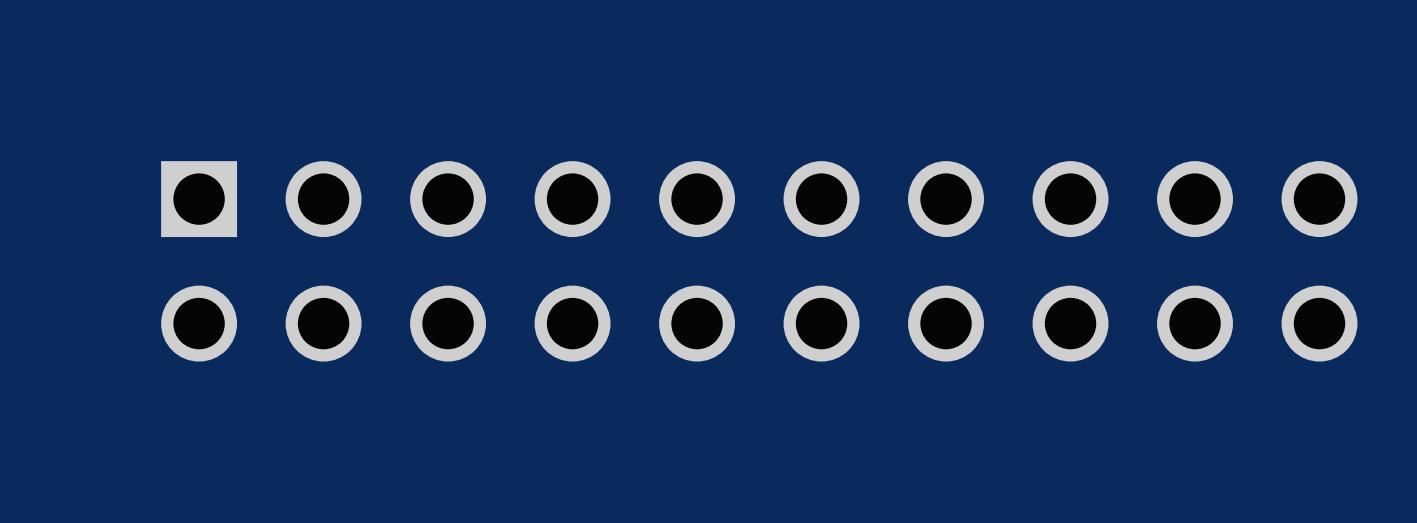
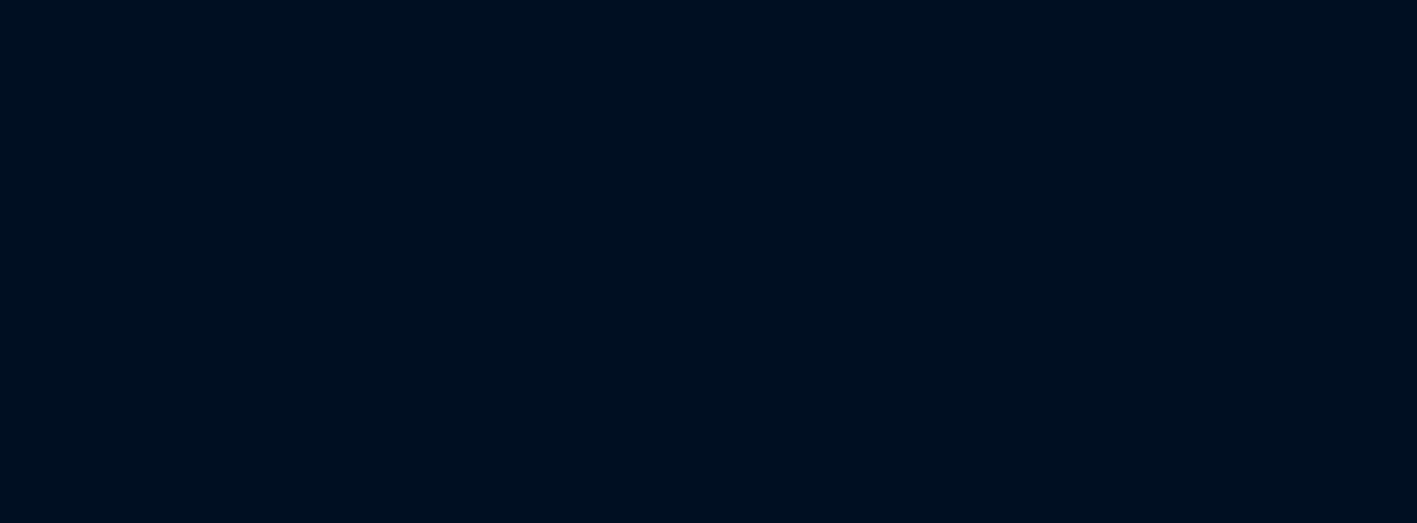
part: (759, 261) -> none

